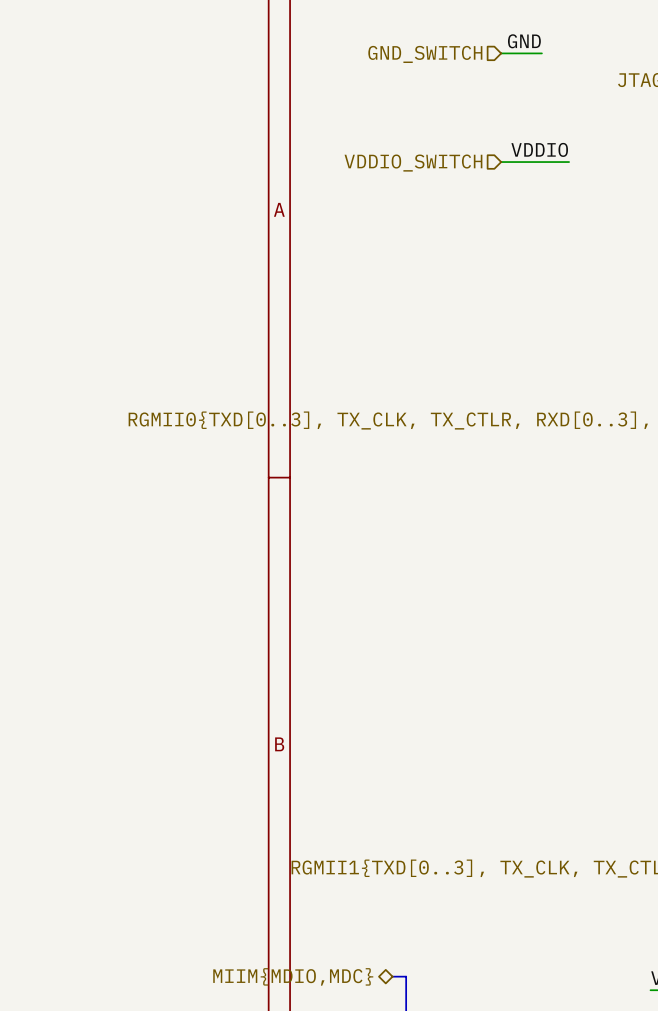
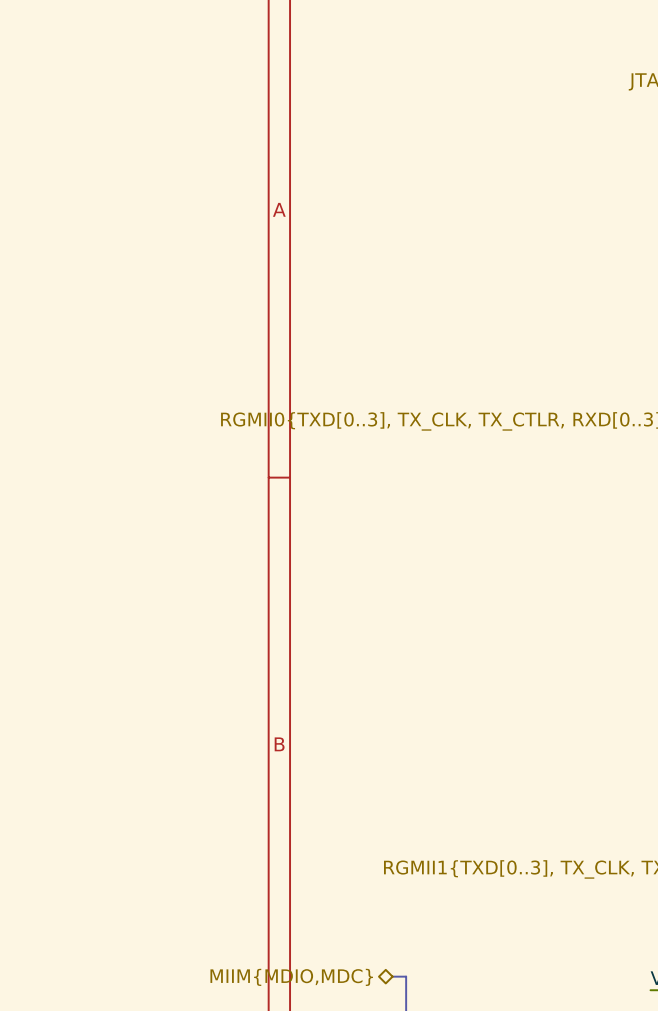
label: GND (524, 41) -> none
wire: (501, 53) (541, 53) -> none
hierarchical label: GND_SWITCH (425, 54) -> none
label: VDDIO (539, 149) -> none
wire: (501, 162) (569, 162) -> none
hierarchical label: VDDIO_SWITCH (413, 163) -> none

